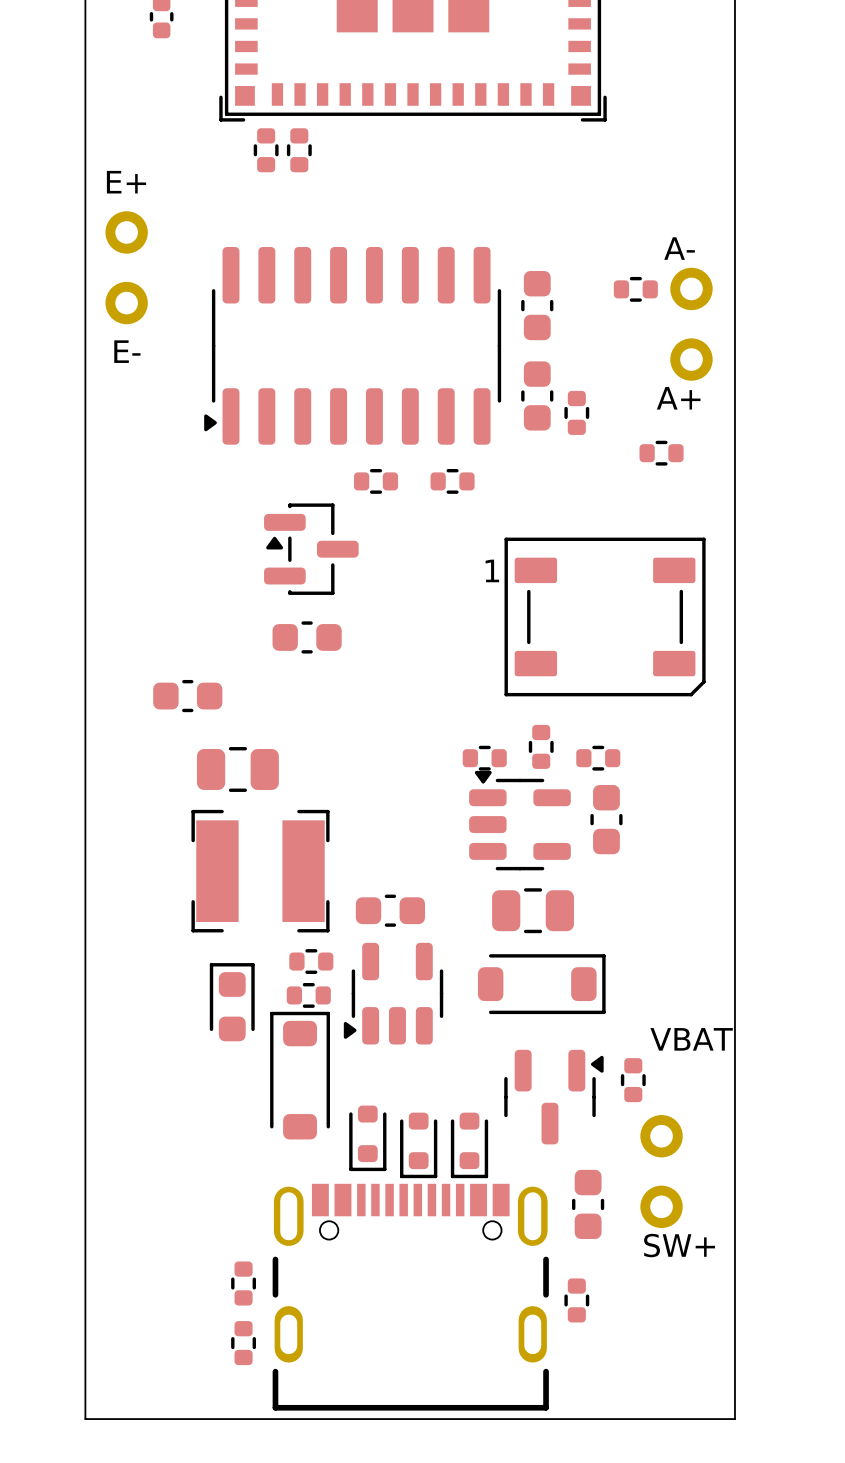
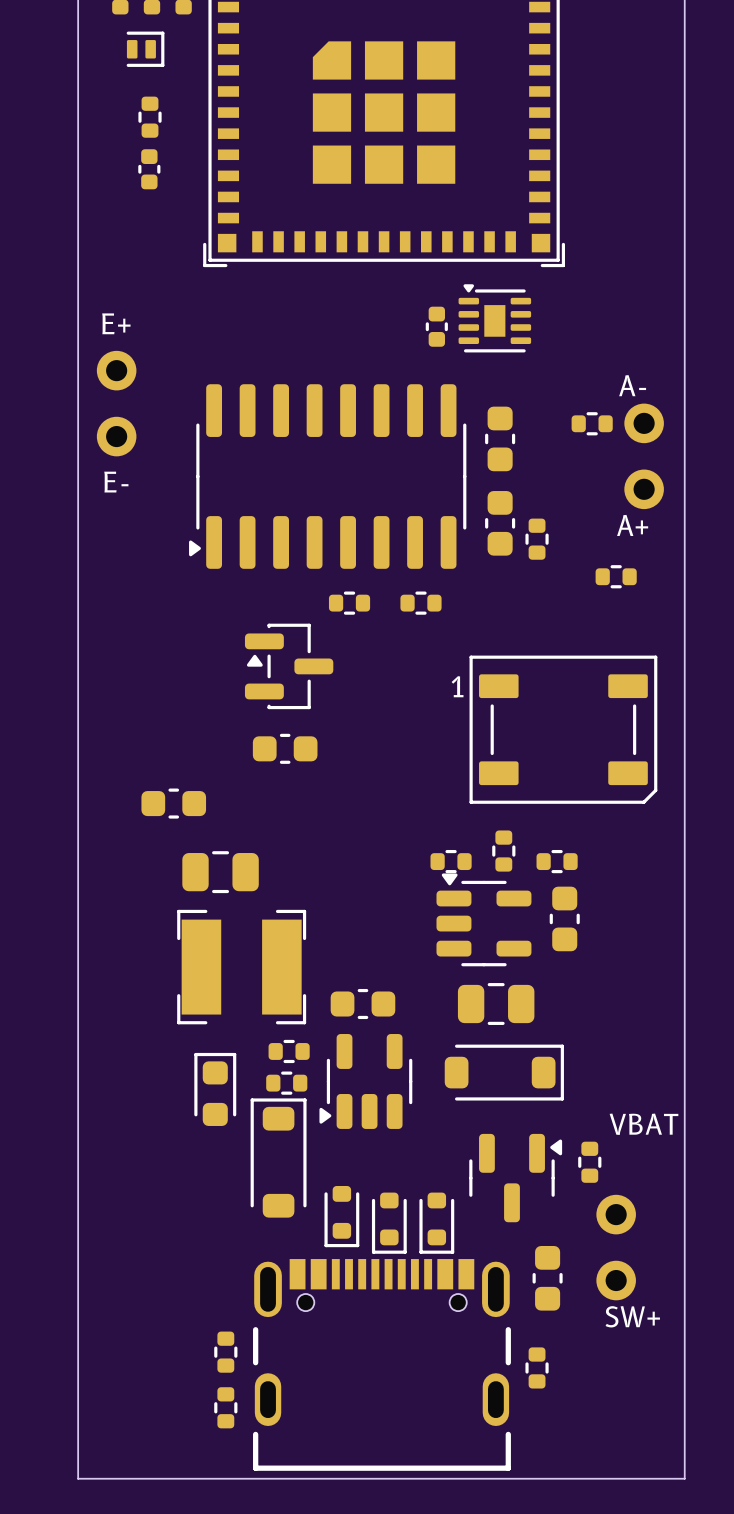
part: (266, 150) -> none
part: (299, 150) -> none
part: none -> (494, 318)
part: none -> (436, 326)

